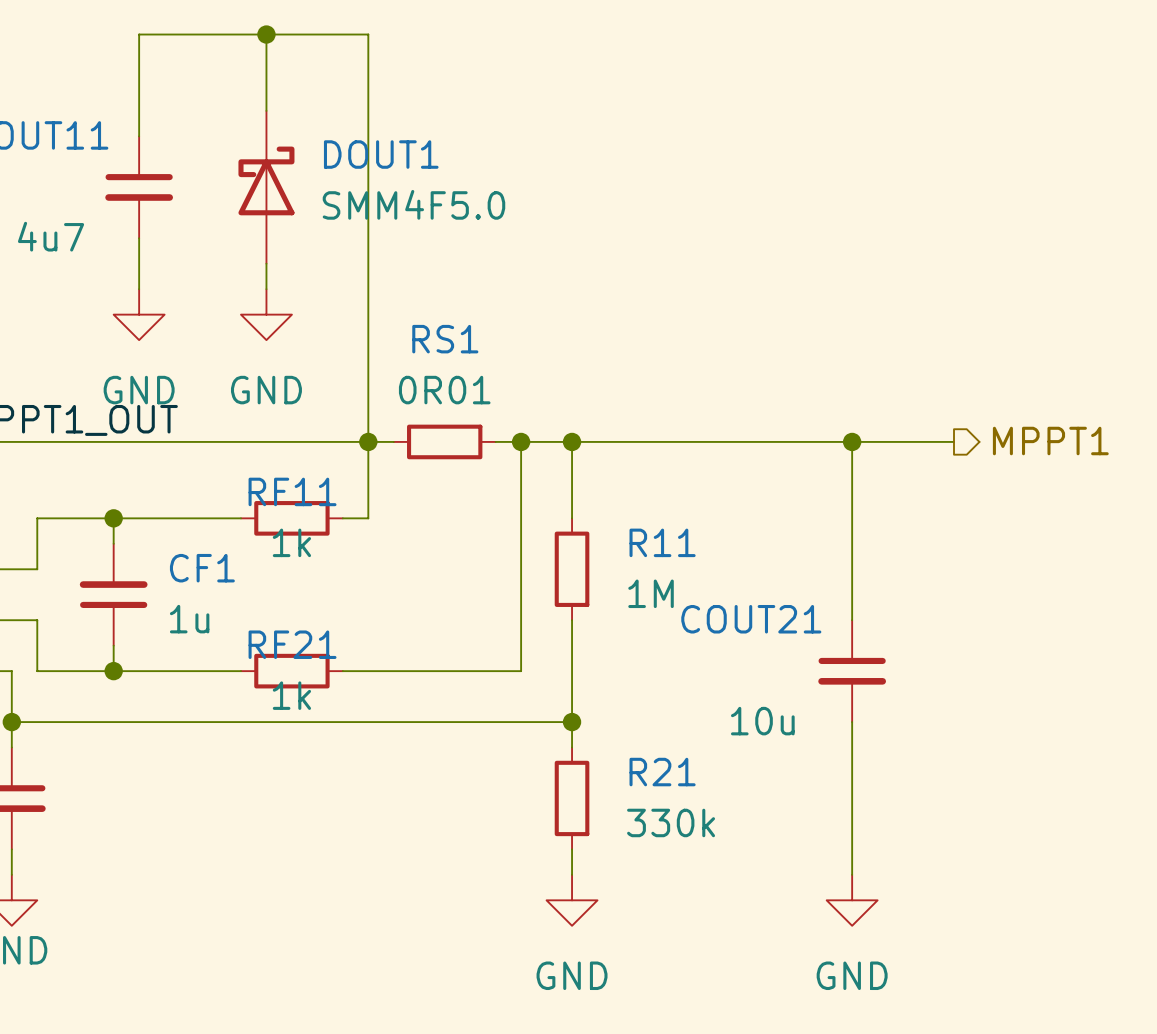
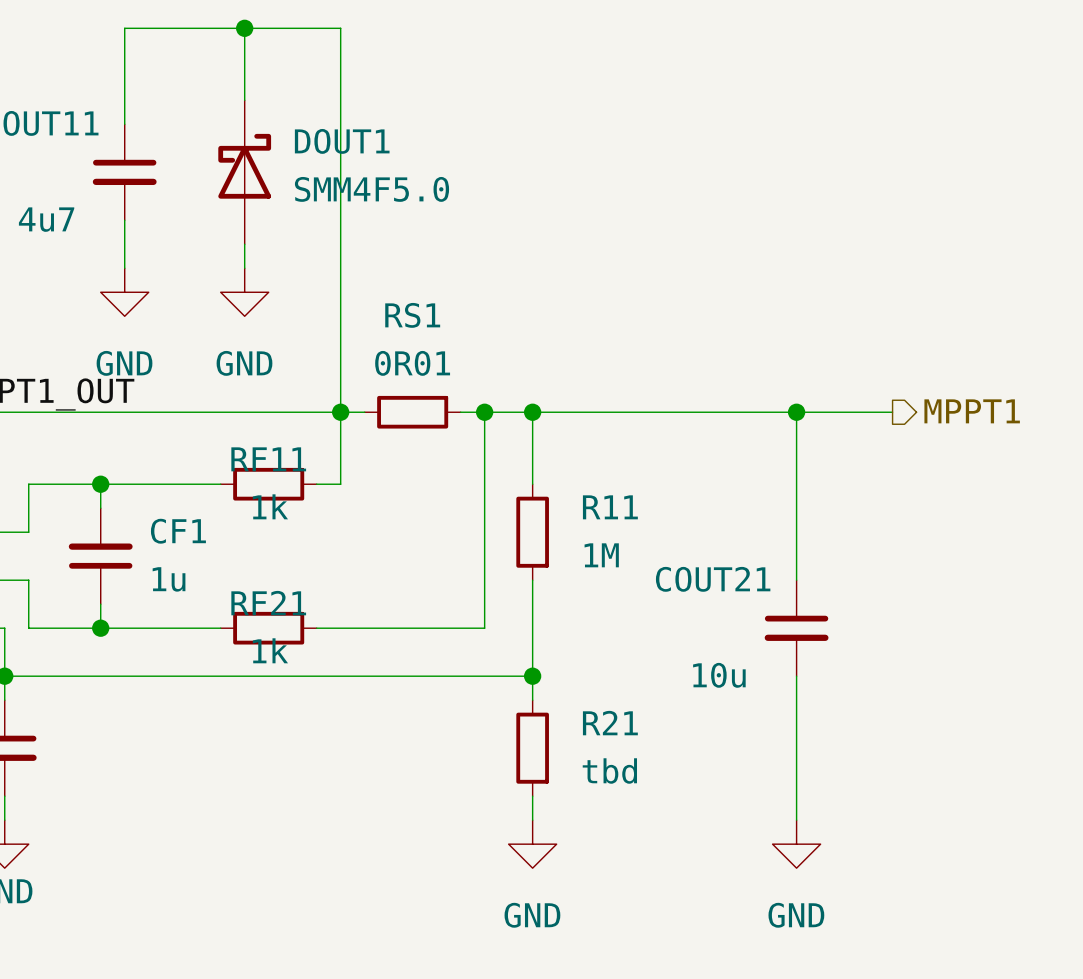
R21 value: 330k (671, 822) -> tbd (609, 771)

